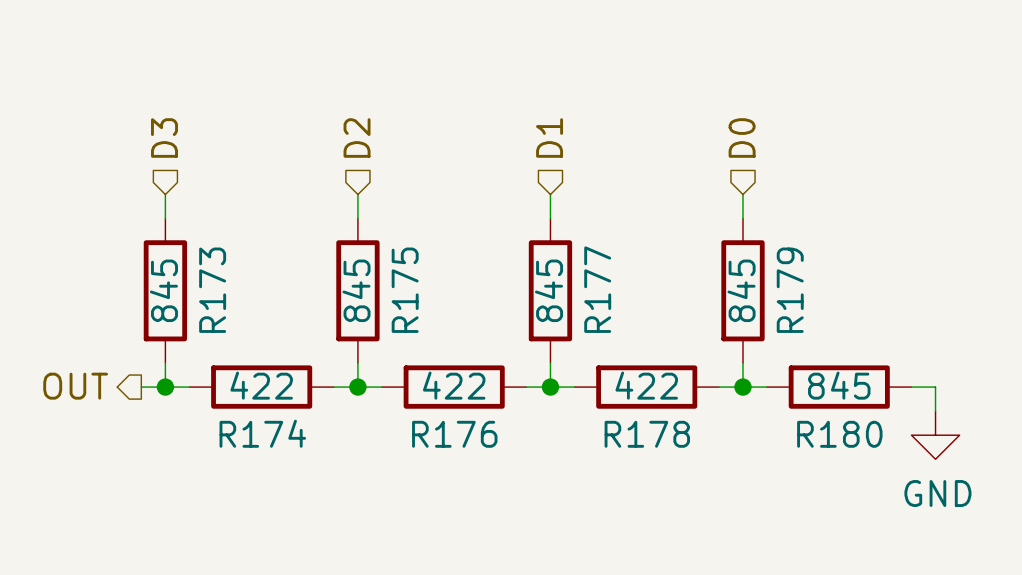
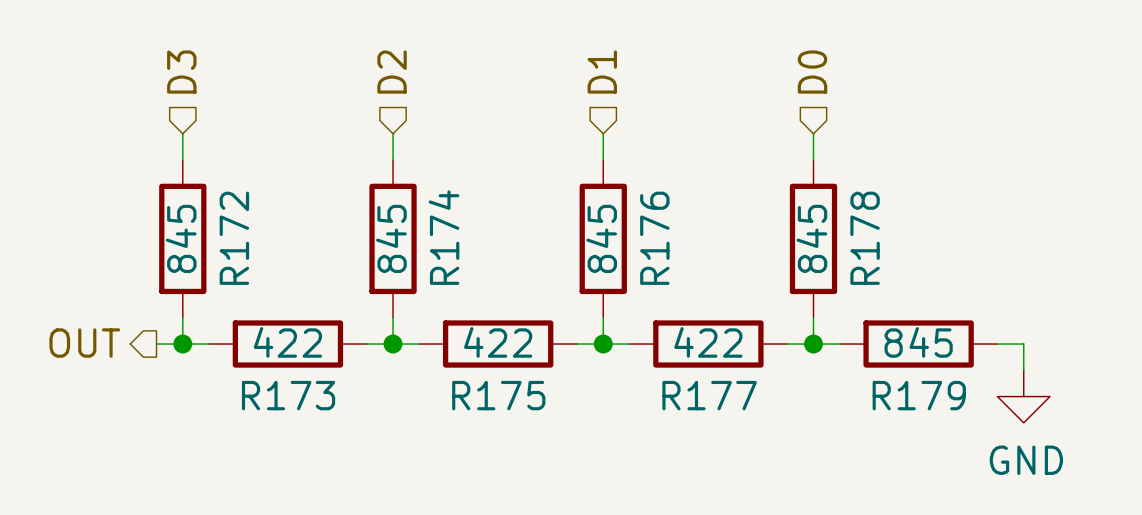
R177 name: R177 (597, 289) -> R176 (654, 238)
R173 name: R173 (212, 290) -> R172 (234, 238)
R175 name: R175 (405, 290) -> R174 (443, 237)
R179 name: R179 (790, 290) -> R178 (865, 238)
R174 name: R174 (262, 433) -> R173 (288, 395)
R176 name: R176 (454, 434) -> R175 (498, 395)
R178 name: R178 (647, 434) -> R177 (709, 395)
R180 name: R180 (839, 434) -> R179 (919, 395)

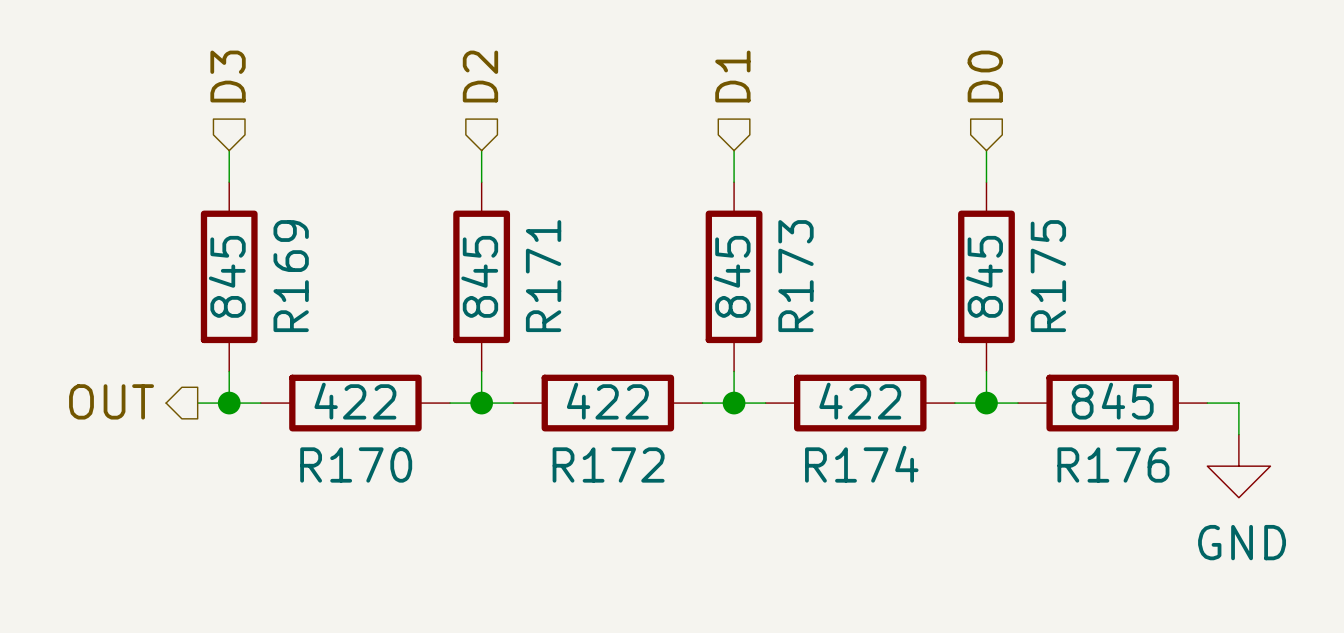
R174 name: R174 (443, 237) -> R171 (543, 276)
R172 name: R172 (234, 238) -> R169 (291, 276)
R176 name: R176 (654, 238) -> R173 (795, 276)
R178 name: R178 (865, 238) -> R175 (1048, 276)
R173 name: R173 (288, 395) -> R170 (356, 464)
R175 name: R175 (498, 395) -> R172 (608, 464)
R177 name: R177 (709, 395) -> R174 (861, 464)
R179 name: R179 (919, 395) -> R176 (1113, 464)

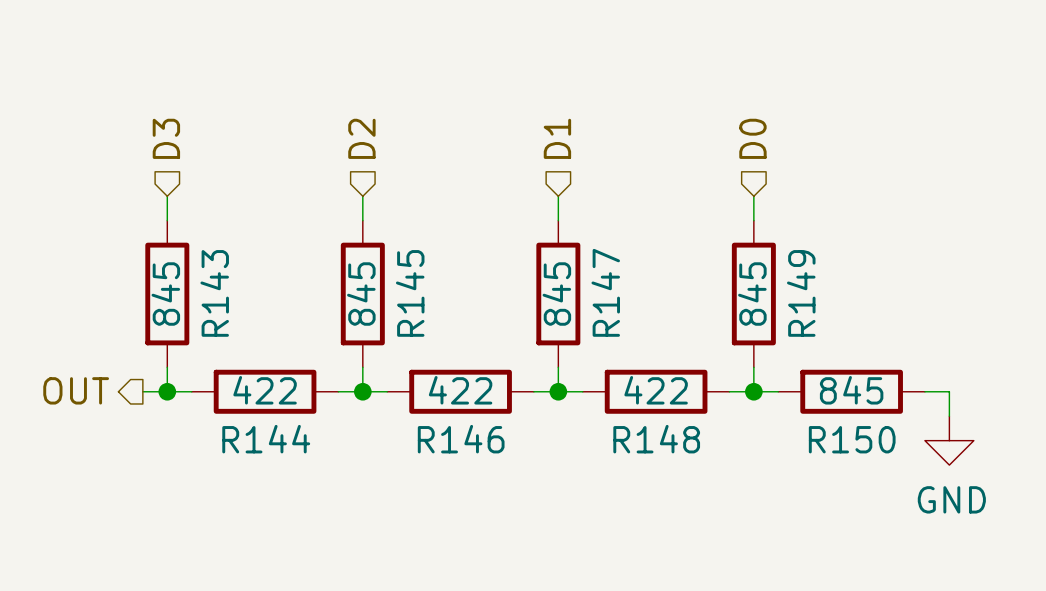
R169 name: R169 (291, 276) -> R143 (214, 293)
R171 name: R171 (543, 276) -> R145 (410, 293)
R173 name: R173 (795, 276) -> R147 (605, 292)
R175 name: R175 (1048, 276) -> R149 (801, 293)
R170 name: R170 (356, 464) -> R144 (266, 439)
R172 name: R172 (608, 464) -> R146 (461, 439)
R174 name: R174 (861, 464) -> R148 (656, 439)
R176 name: R176 (1113, 464) -> R150 (852, 439)

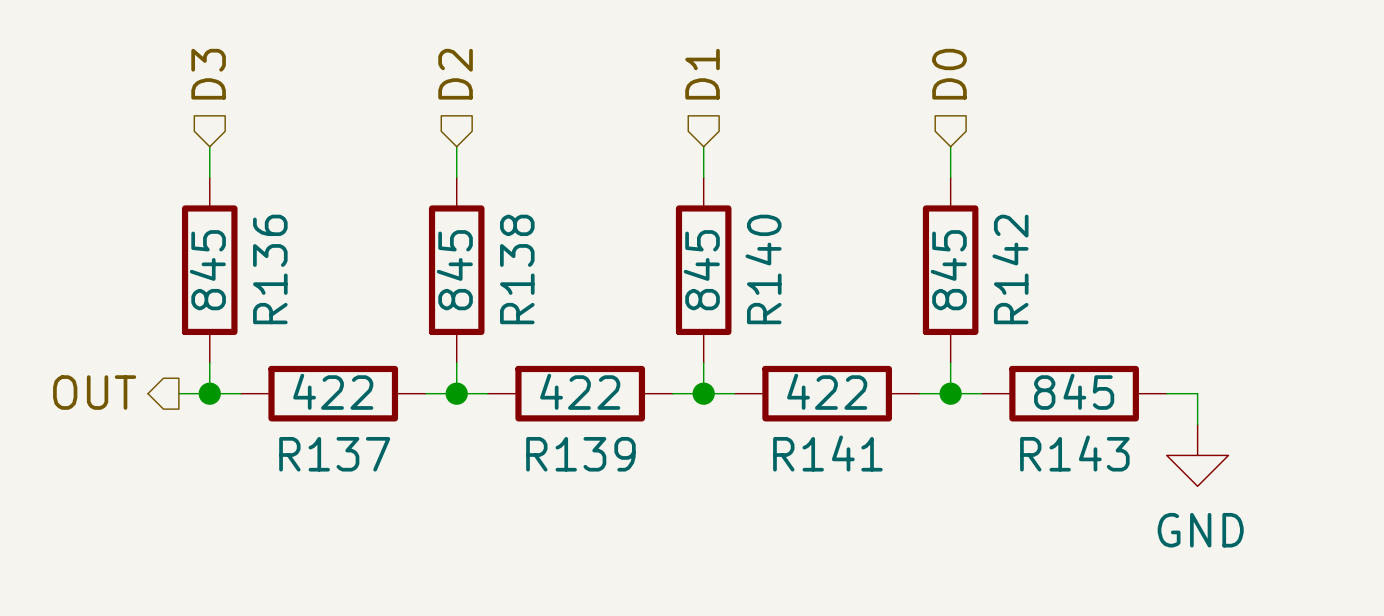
R147 name: R147 (605, 292) -> R140 (763, 269)
R143 name: R143 (214, 293) -> R136 (270, 269)
R145 name: R145 (410, 293) -> R138 (517, 269)
R149 name: R149 (801, 293) -> R142 (1010, 269)
R144 name: R144 (266, 439) -> R137 (334, 454)
R146 name: R146 (461, 439) -> R139 (580, 454)
R148 name: R148 (656, 439) -> R141 (827, 453)
R150 name: R150 (852, 439) -> R143 (1074, 453)

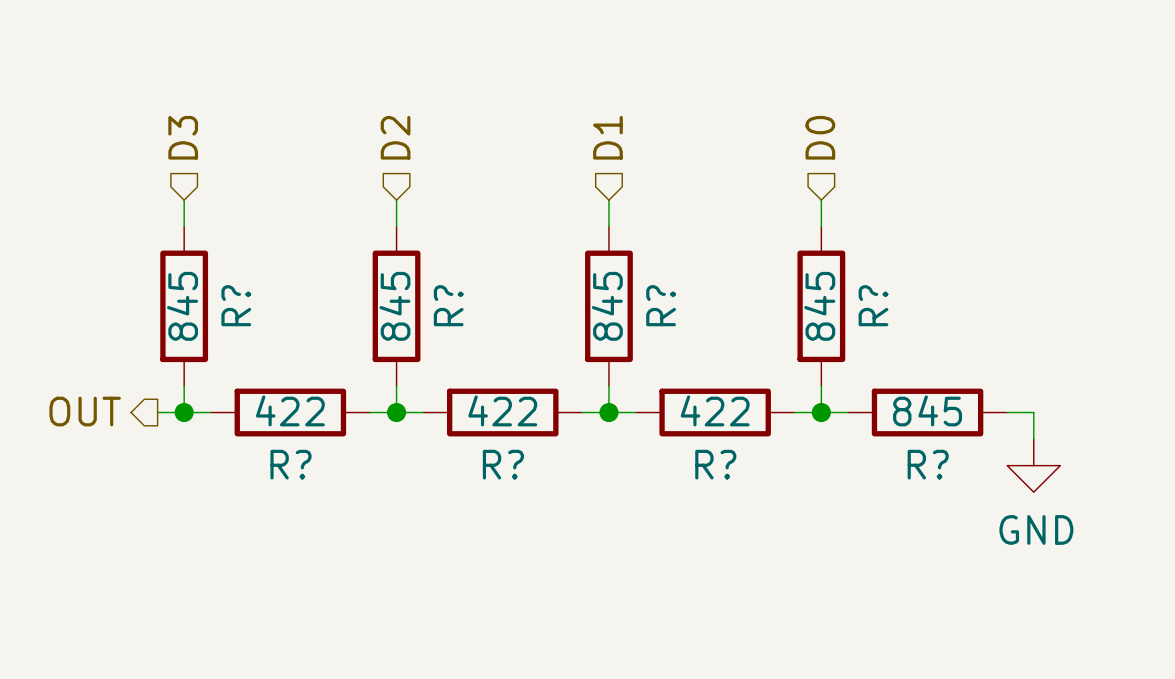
R136 name: R136 (270, 269) -> R? (236, 305)
R138 name: R138 (517, 269) -> R? (448, 305)
R140 name: R140 (763, 269) -> R? (661, 305)
R142 name: R142 (1010, 269) -> R? (873, 305)
R141 name: R141 (827, 453) -> R? (715, 464)
R143 name: R143 (1074, 453) -> R? (928, 464)
R137 name: R137 (334, 454) -> R? (290, 464)
R139 name: R139 (580, 454) -> R? (503, 464)

